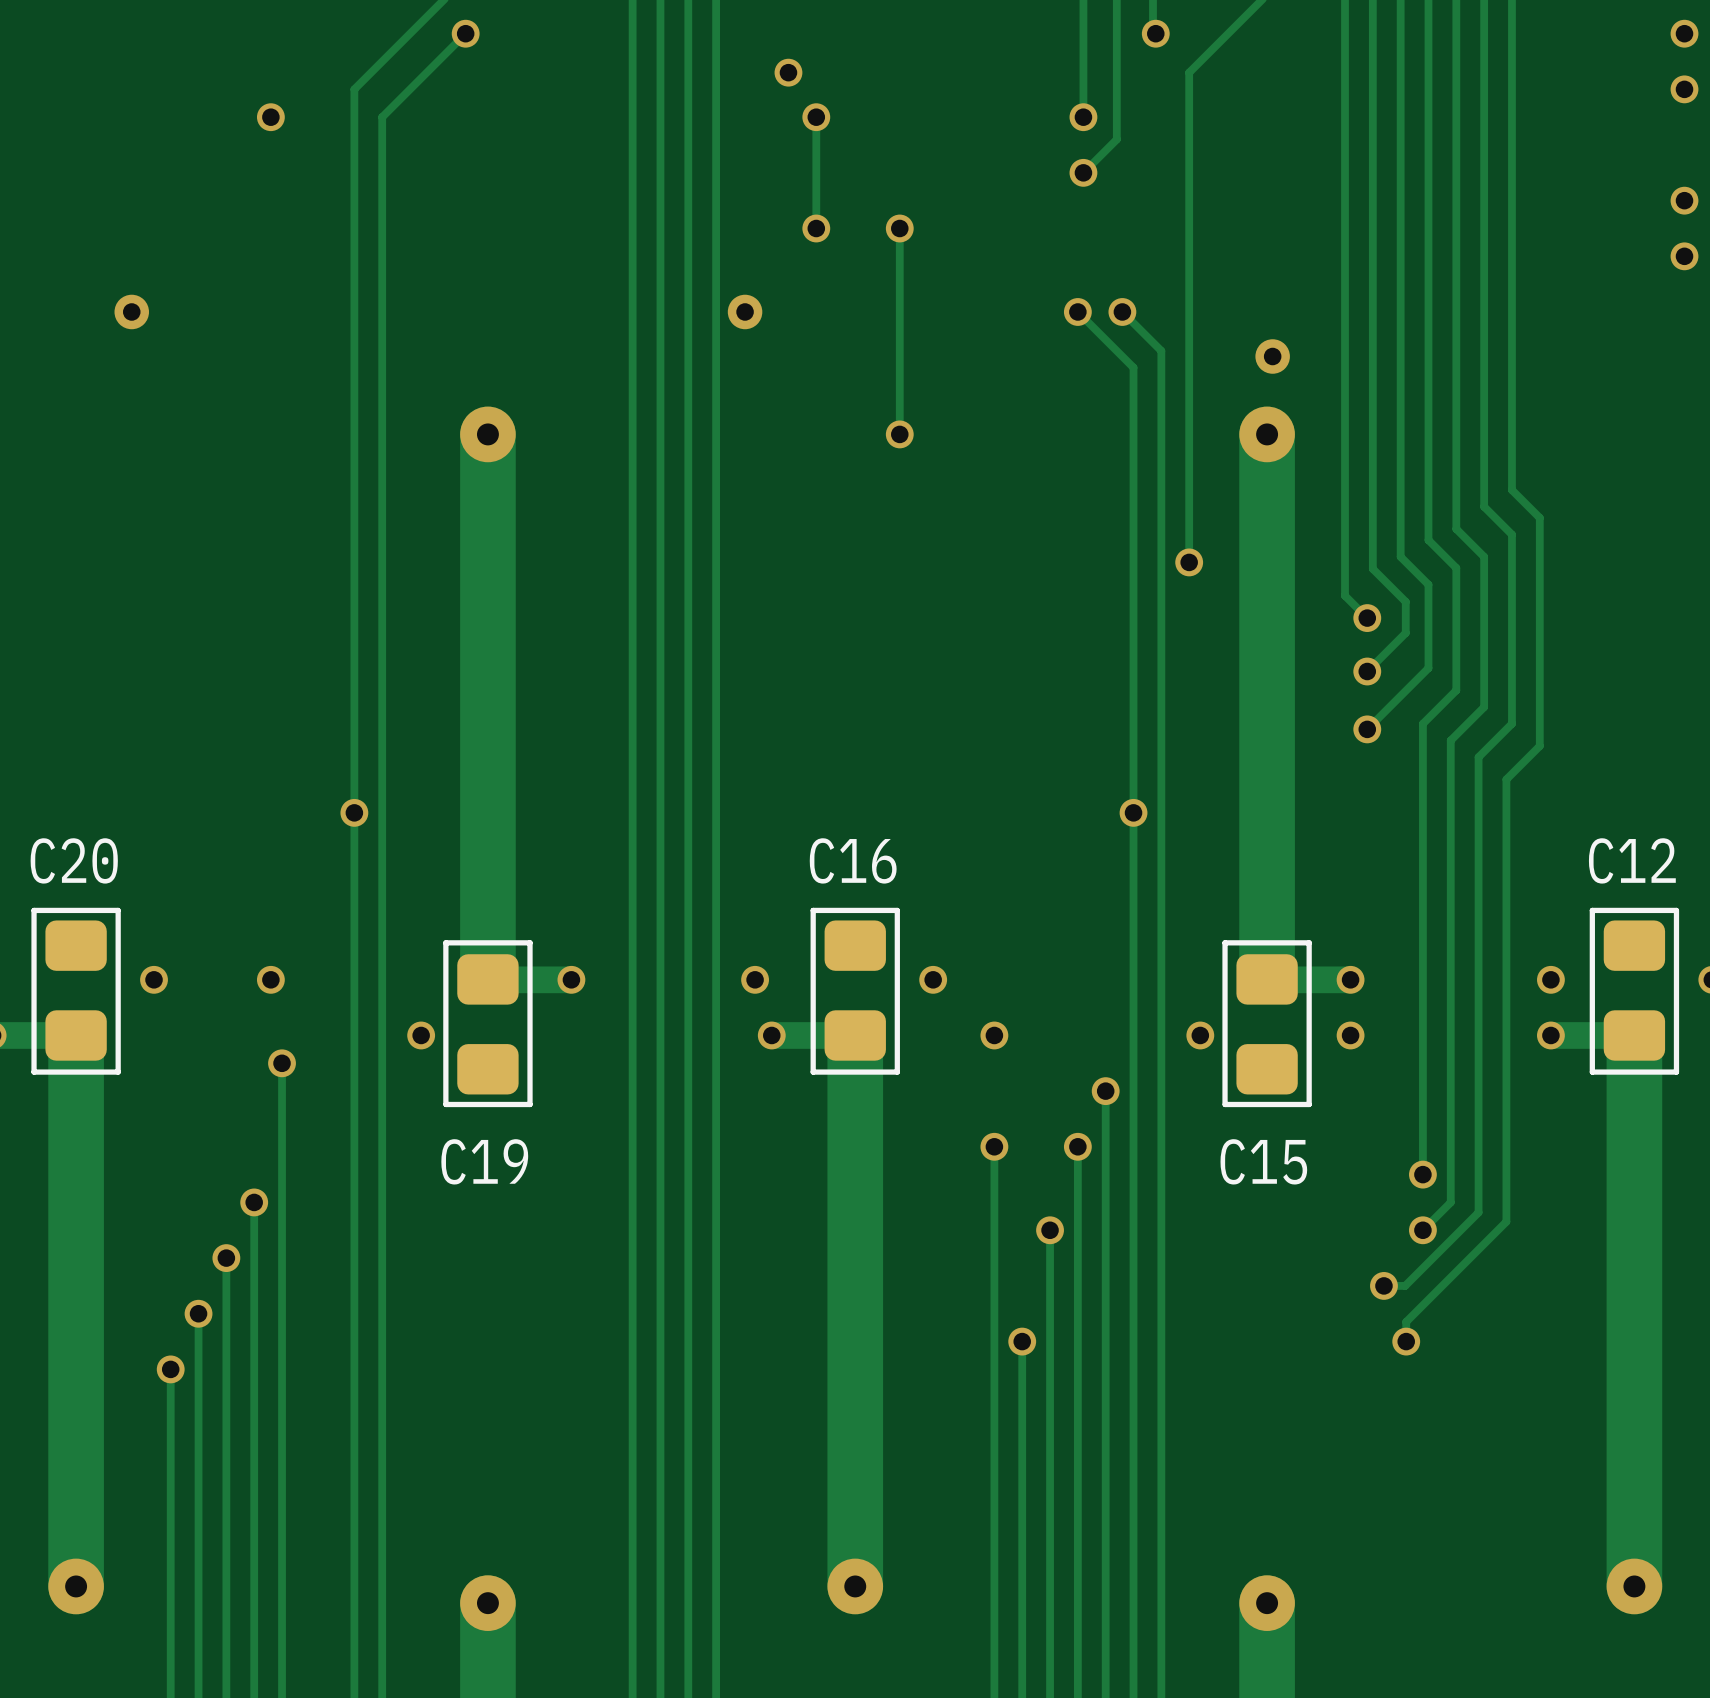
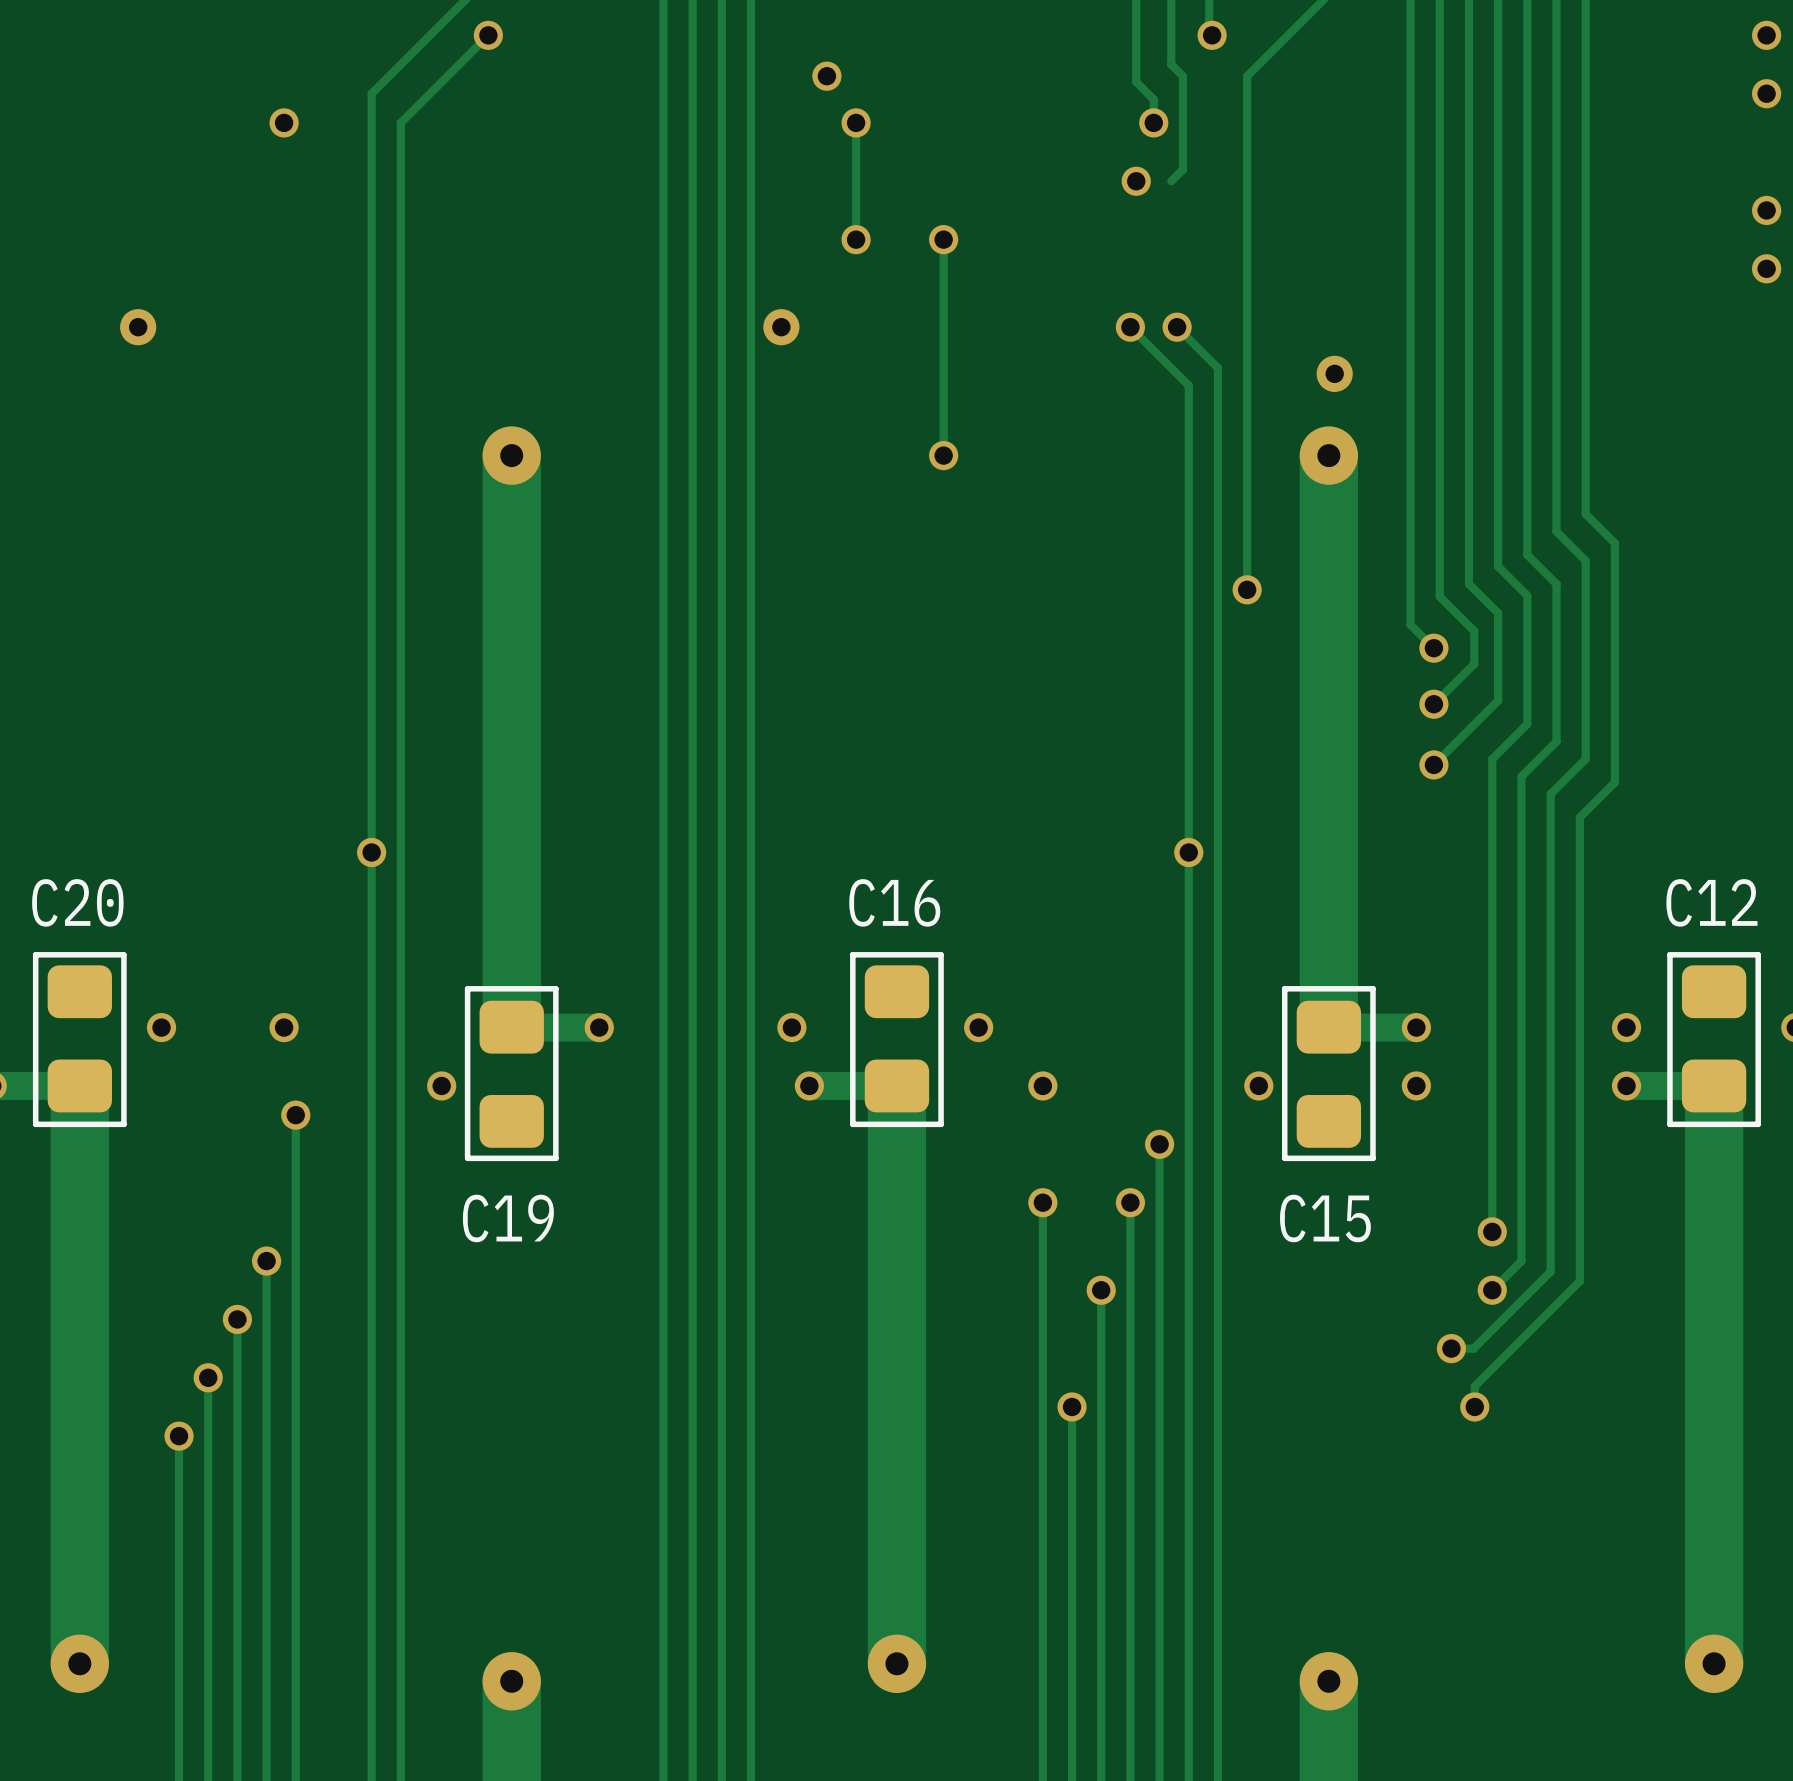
track: (1116, 61) (1116, 139) (1083, 172) -> (1171, 64) (1182, 76) (1182, 169) (1171, 181)
track: (1083, 78) (1083, 117) -> (1136, 82) (1153, 99) (1153, 122)
via position: (1083, 117) -> (1153, 122)

